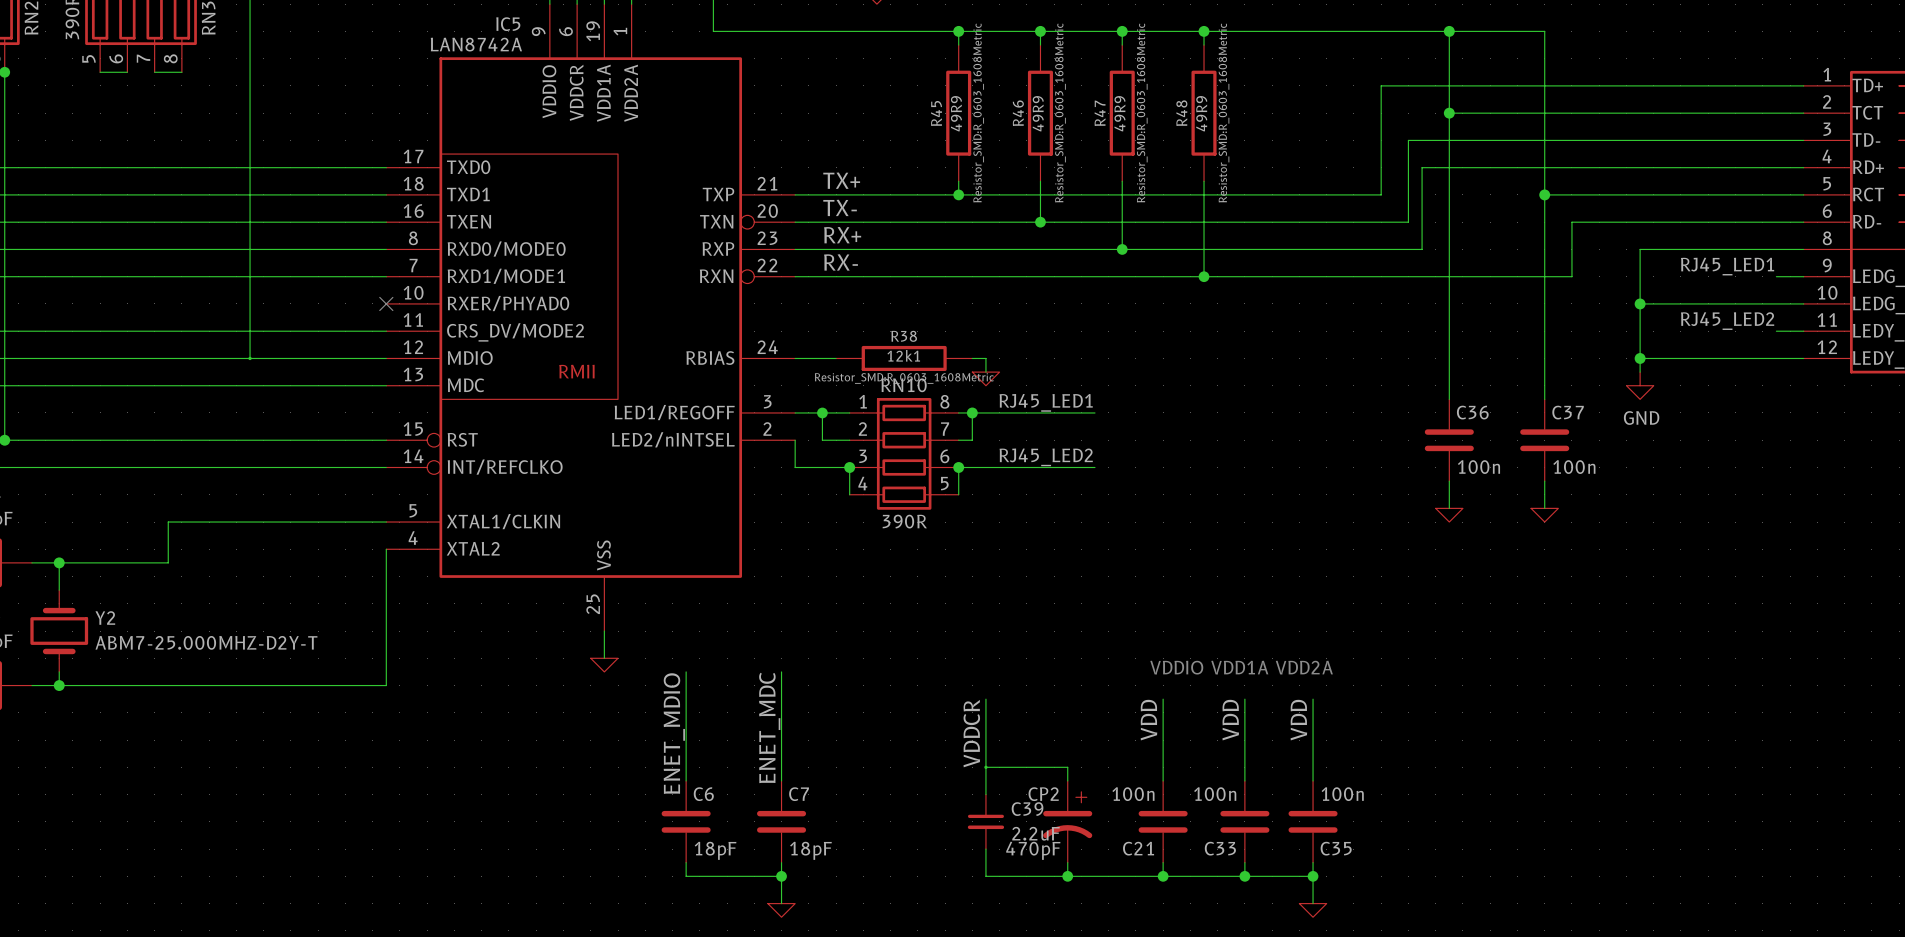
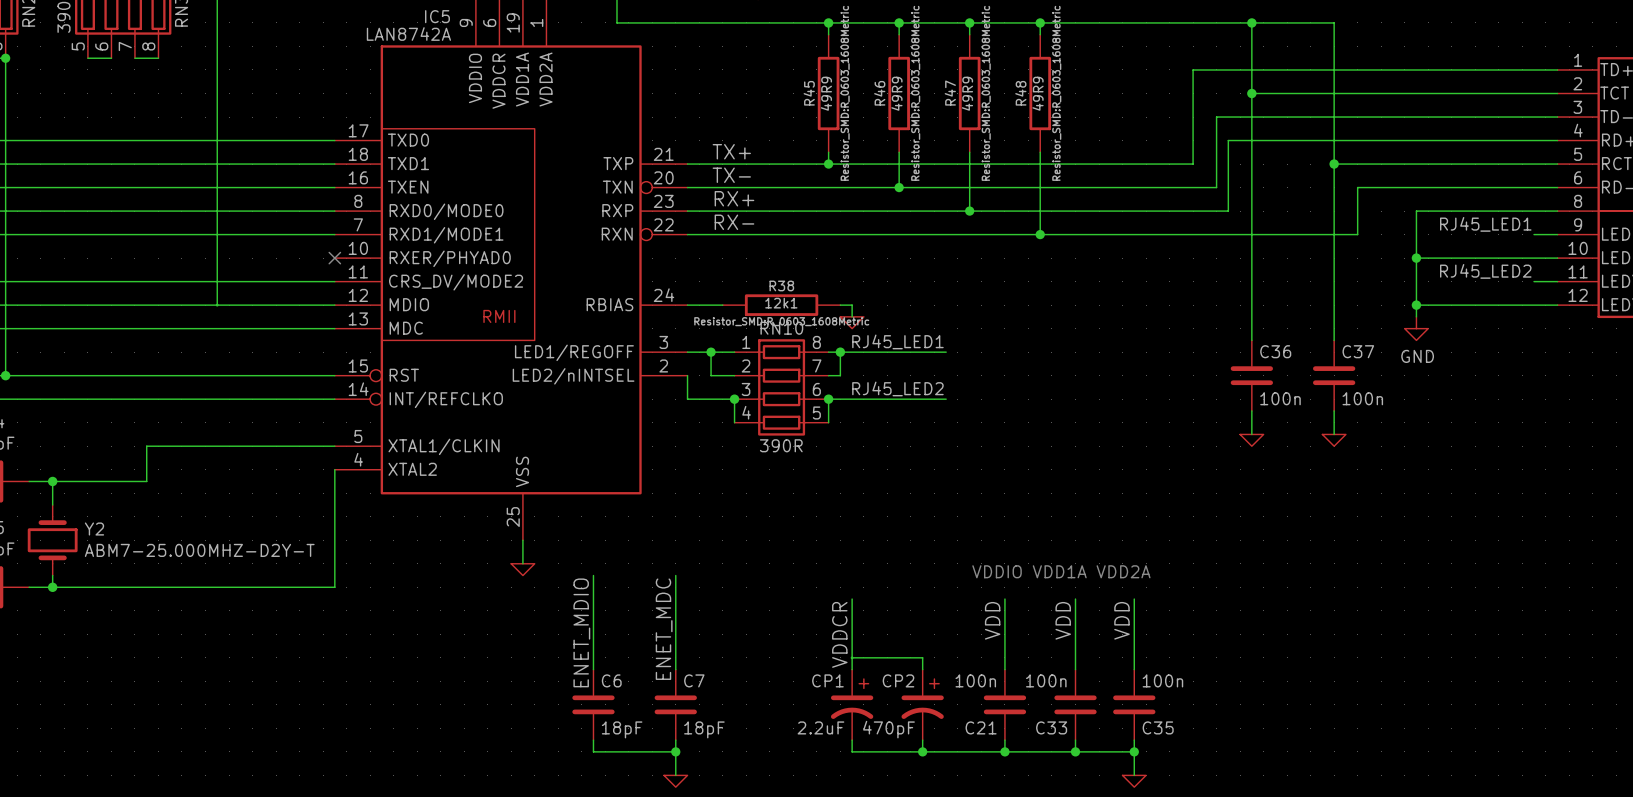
C39: 2.2uF (985, 821) -> none
CP1: none -> 2.2uF (852, 704)

